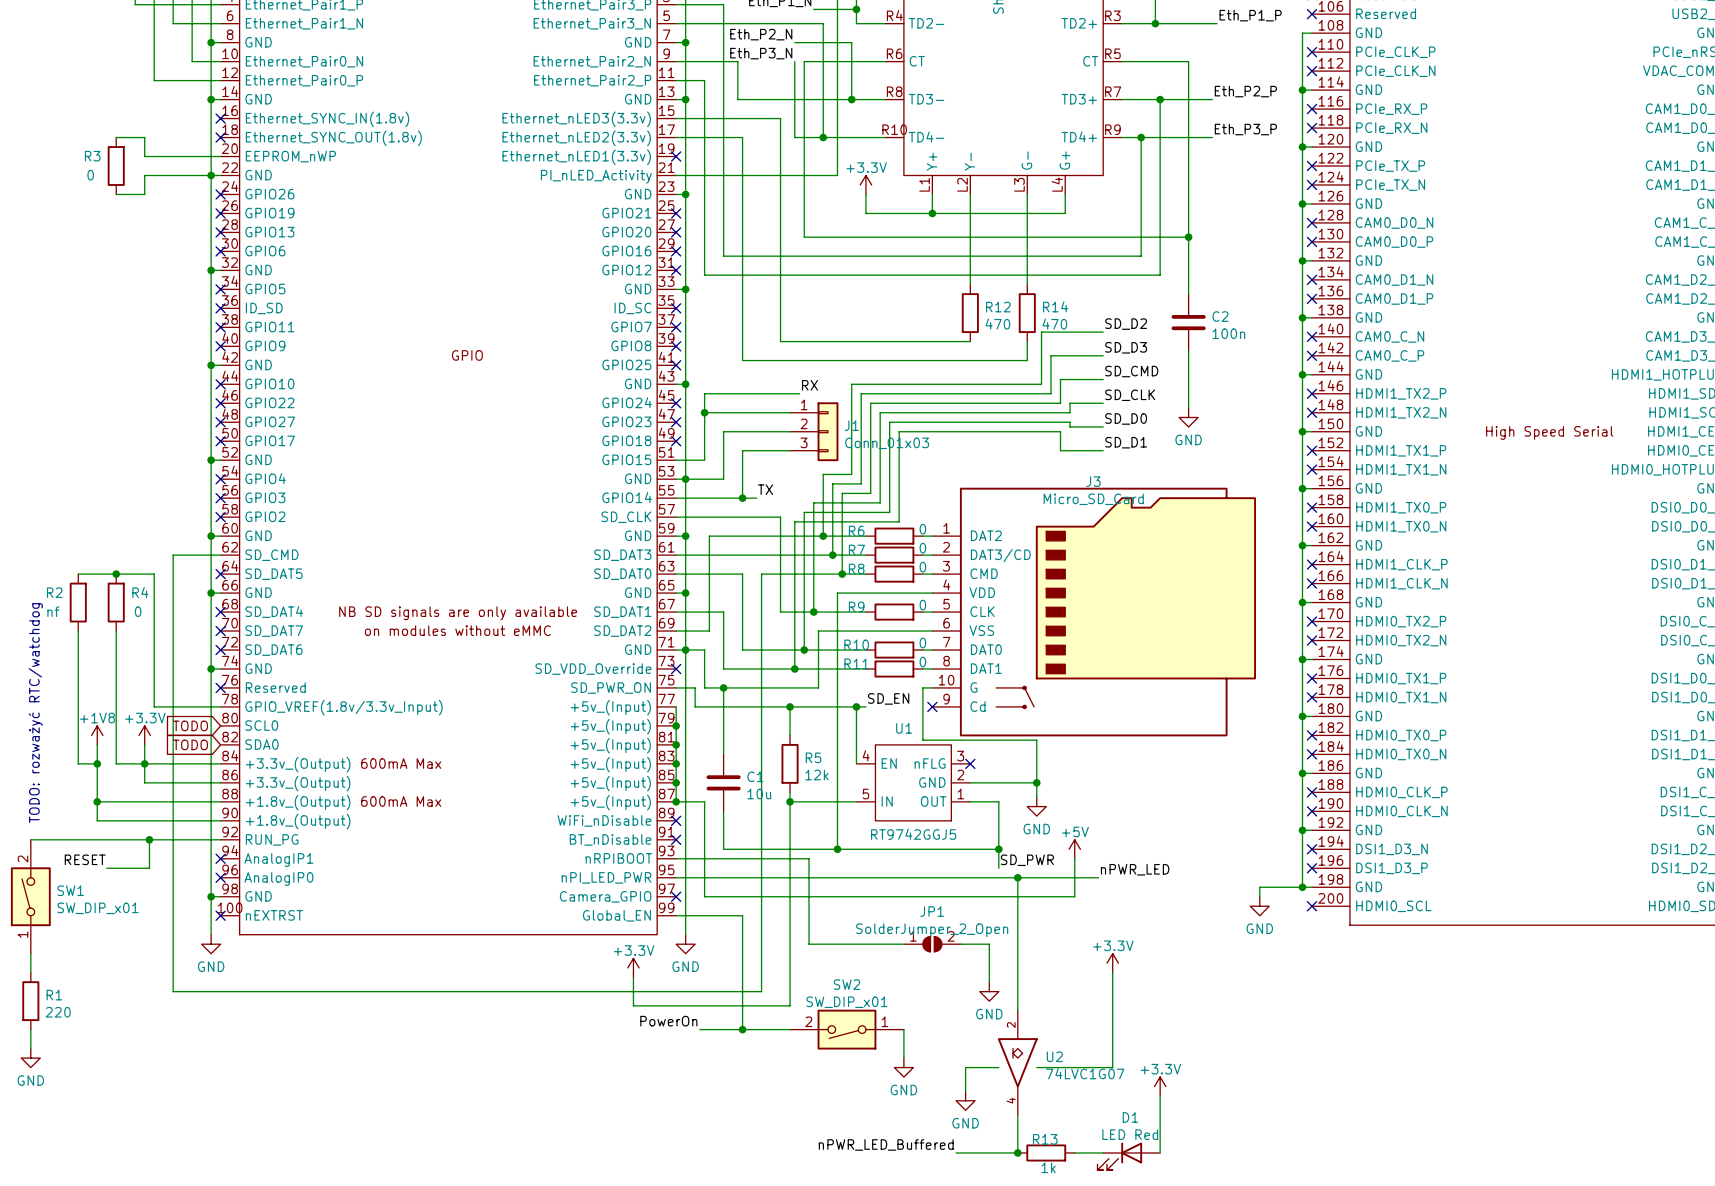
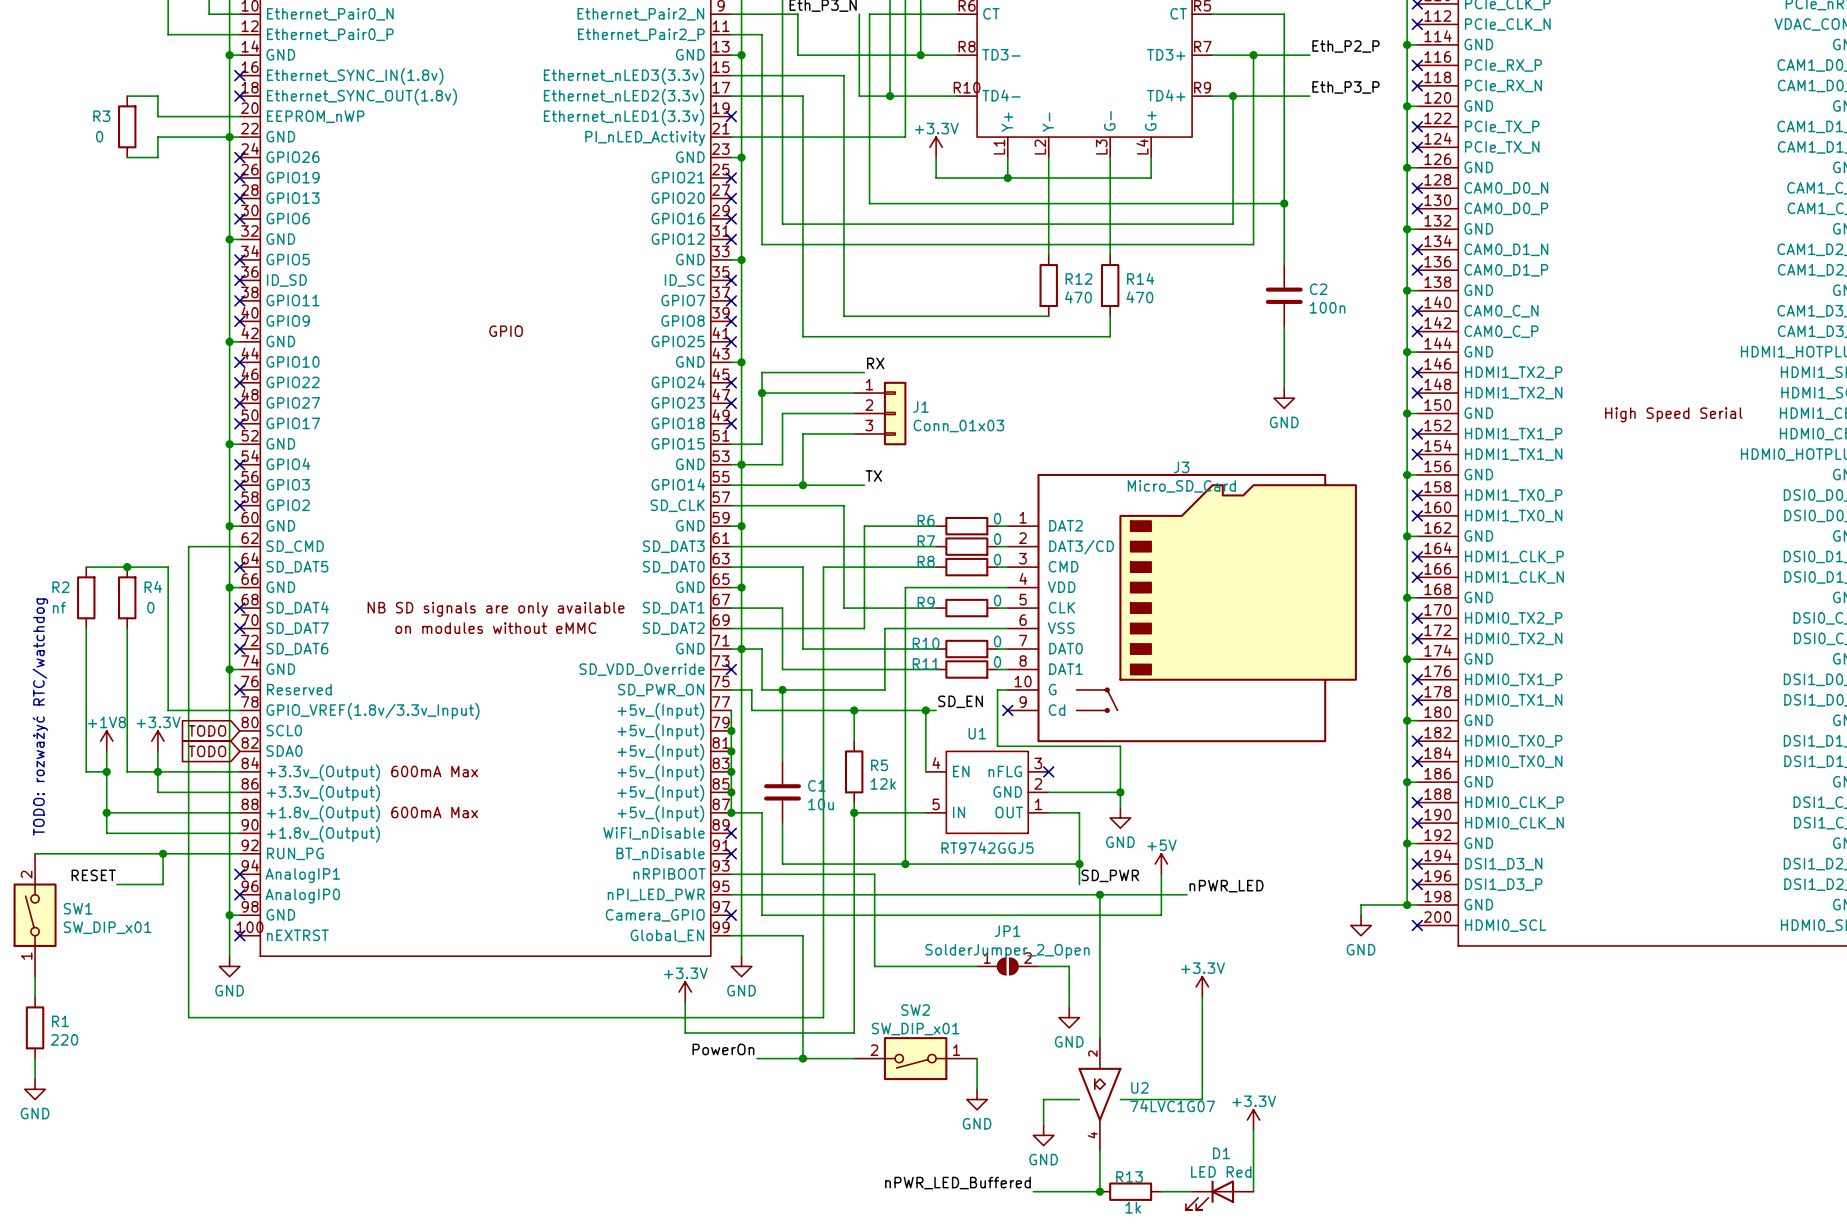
label: SD_D2 (1126, 324) -> none
wire: (1103, 332) (1041, 332) (1041, 384) (851, 384) (851, 474) (823, 474) (823, 536) -> none
label: SD_D3 (1126, 347) -> none
wire: (1103, 355) (1051, 355) (1051, 393) (861, 393) (861, 483) (832, 483) (832, 555) -> none
label: SD_CMD (1131, 371) -> none
wire: (1103, 379) (1060, 379) (1060, 403) (870, 403) (870, 493) (842, 493) (842, 574) -> none
label: SD_CLK (1130, 395) -> none
wire: (1103, 403) (1069, 403) (1069, 412) (880, 412) (880, 502) (813, 502) (813, 612) -> none
label: SD_D0 (1126, 418) -> none
wire: (1103, 426) (1069, 426) (1069, 422) (889, 422) (889, 512) (804, 512) (804, 650) -> none
label: SD_D1 (1126, 442) -> none
wire: (1103, 450) (1060, 450) (1060, 431) (899, 431) (899, 521) (794, 521) (794, 668) -> none
label position: TX (765, 489) -> TX (873, 476)
wire: none -> (818, 485) (864, 485)
wire: (799, 536) (709, 536) (709, 631) -> (864, 526) (864, 628) (767, 628)
junction: (823, 536) -> none
junction: (832, 555) -> none
junction: (842, 574) -> none
junction: (813, 612) -> none
junction: (804, 650) -> none
junction: (794, 668) -> none

